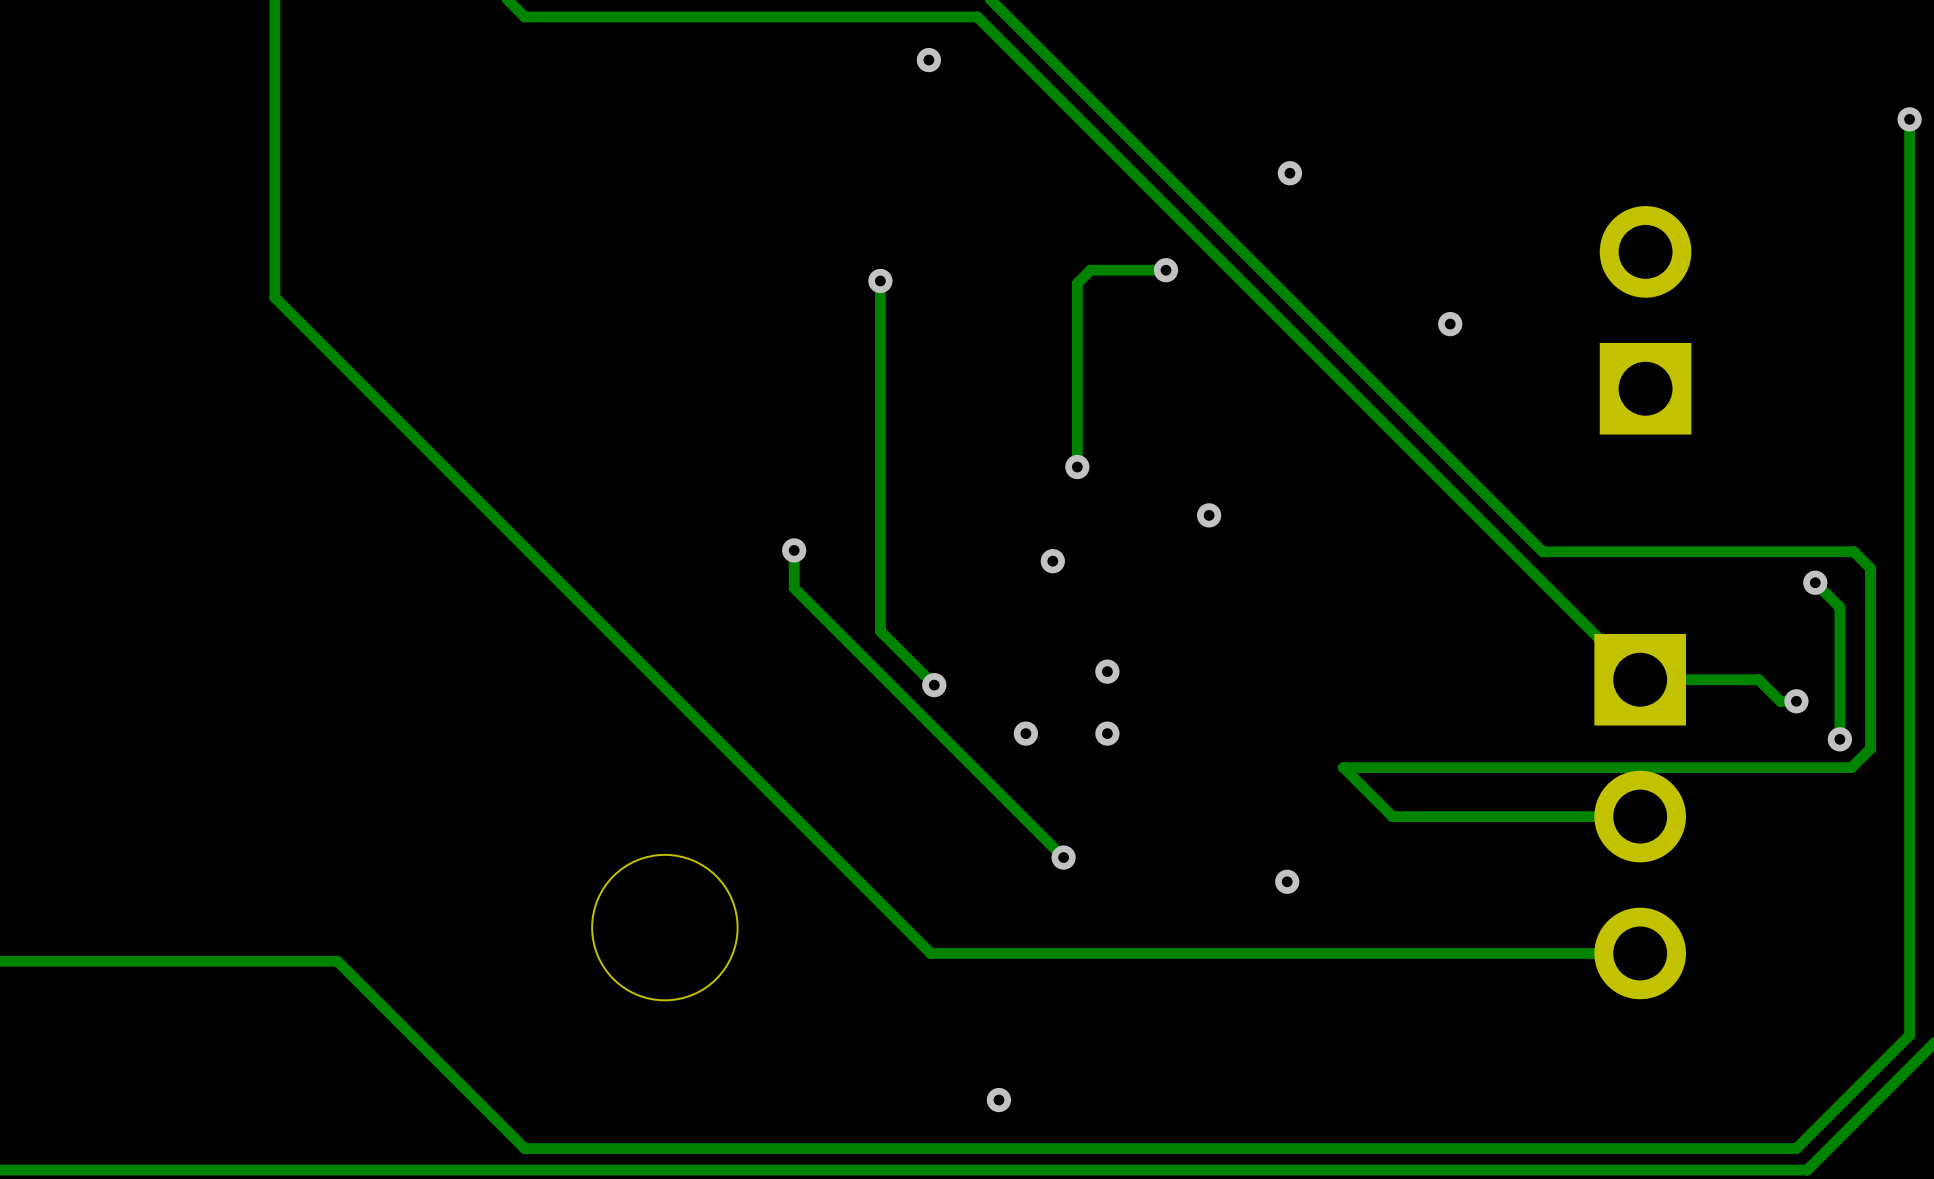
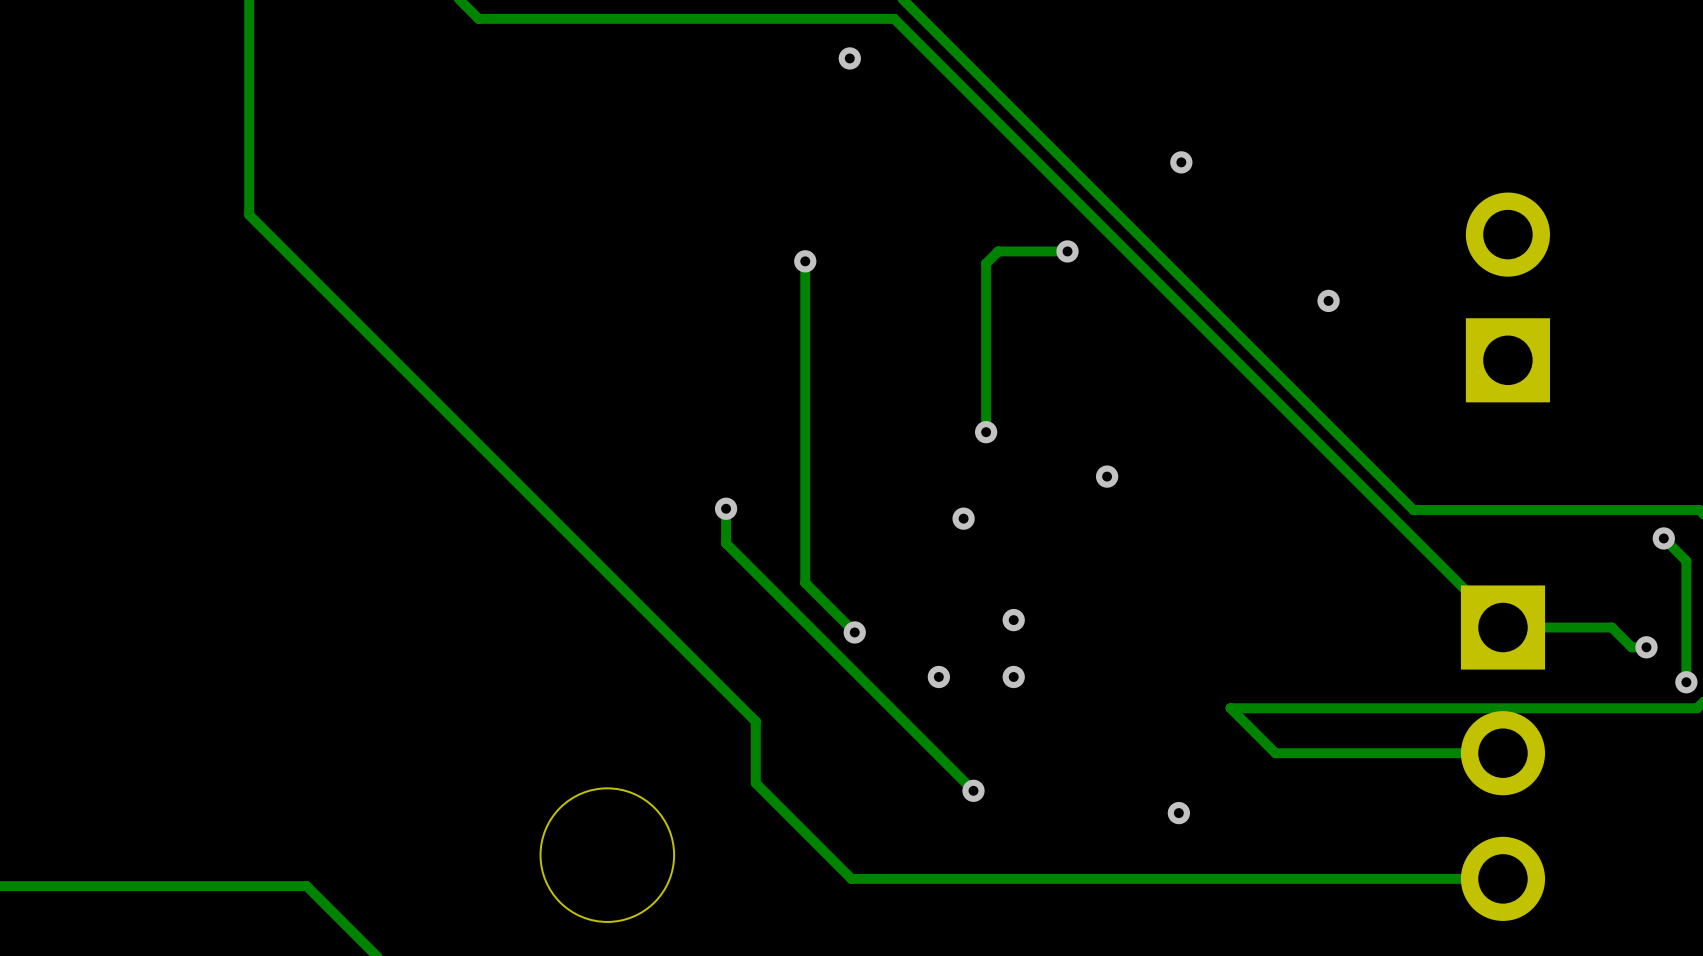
track: (274, 230) (274, 297) (826, 849) -> (249, 214) (755, 721) (755, 783)

